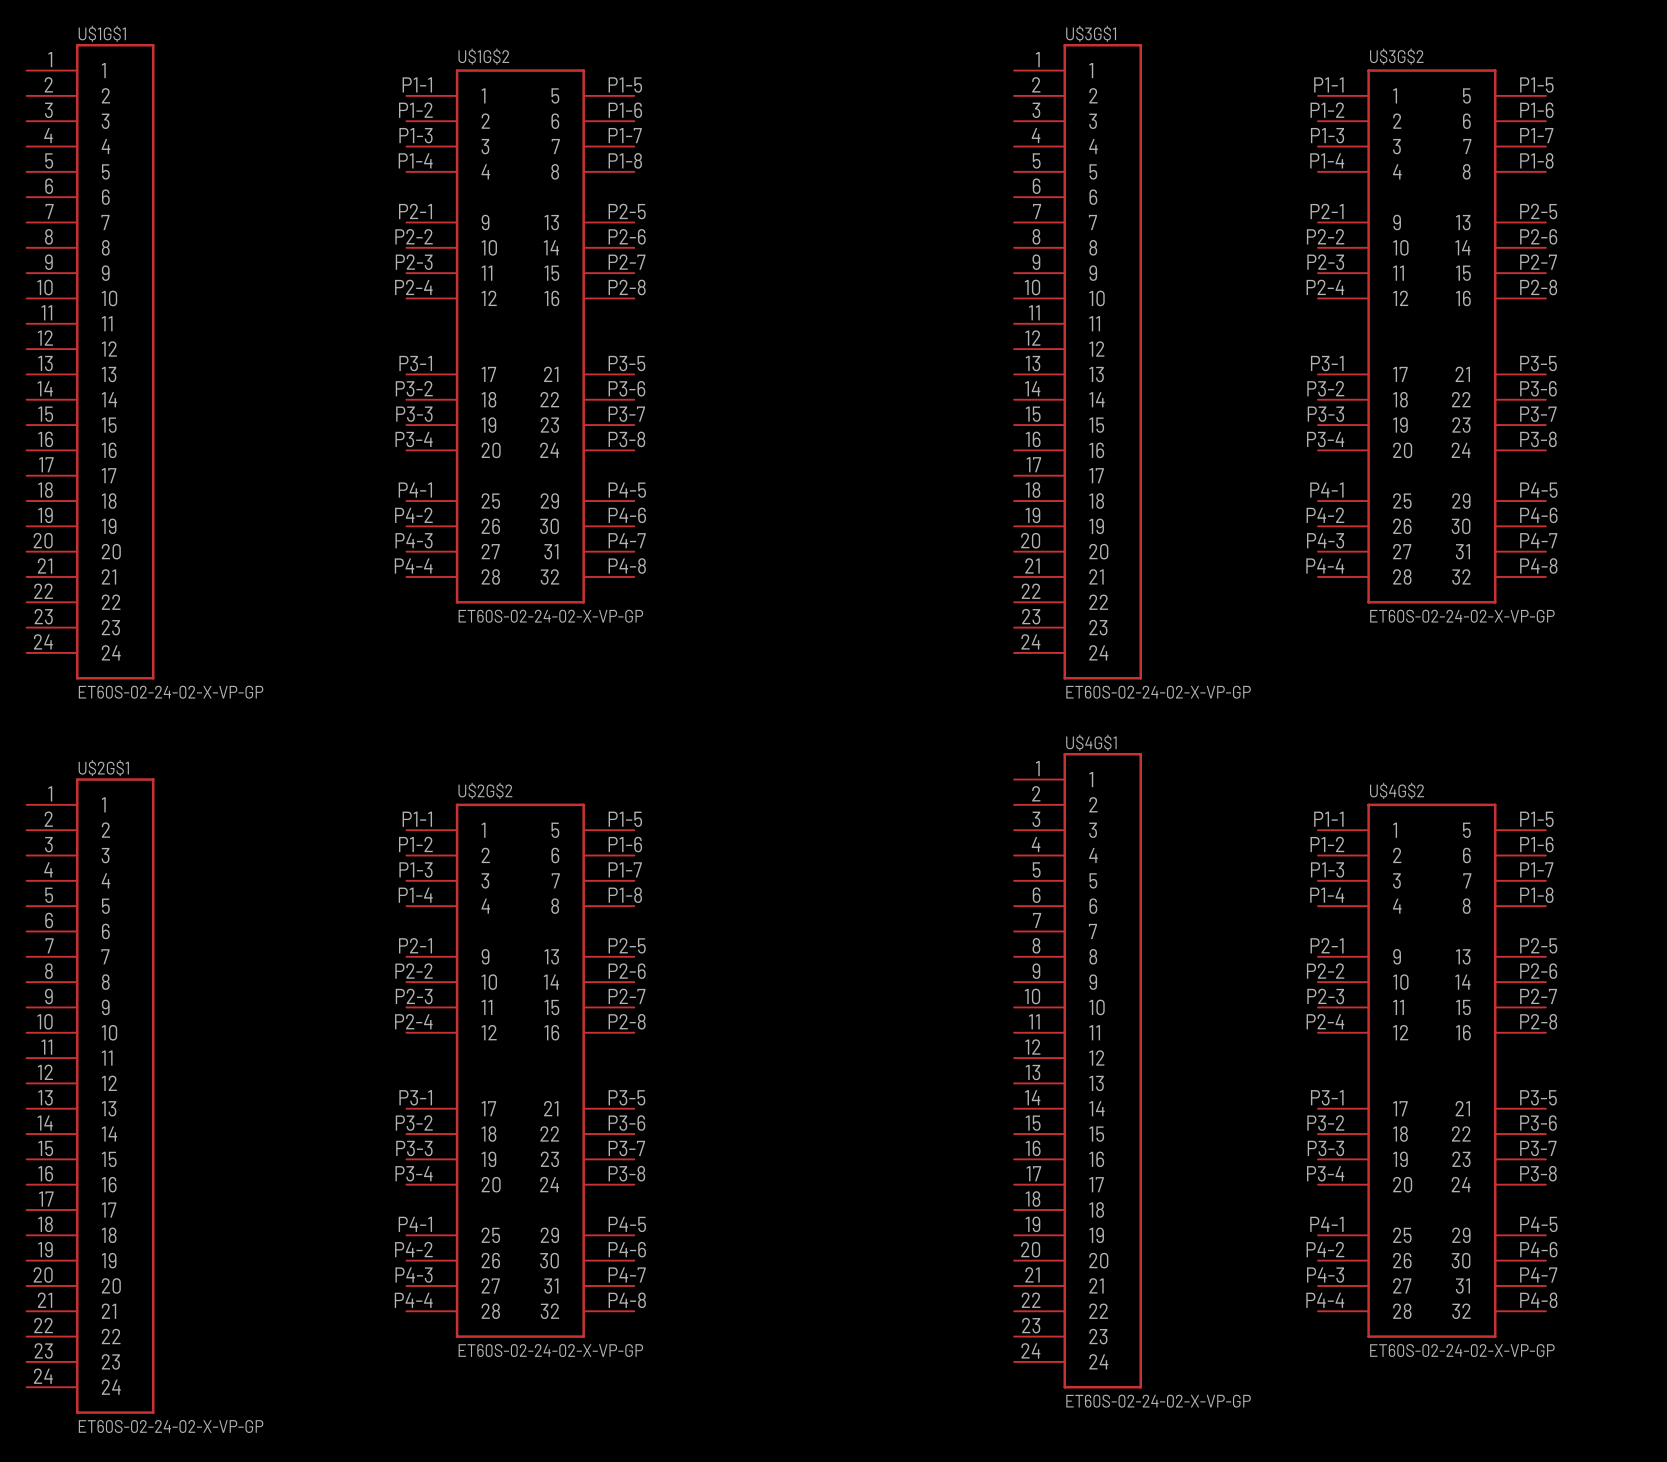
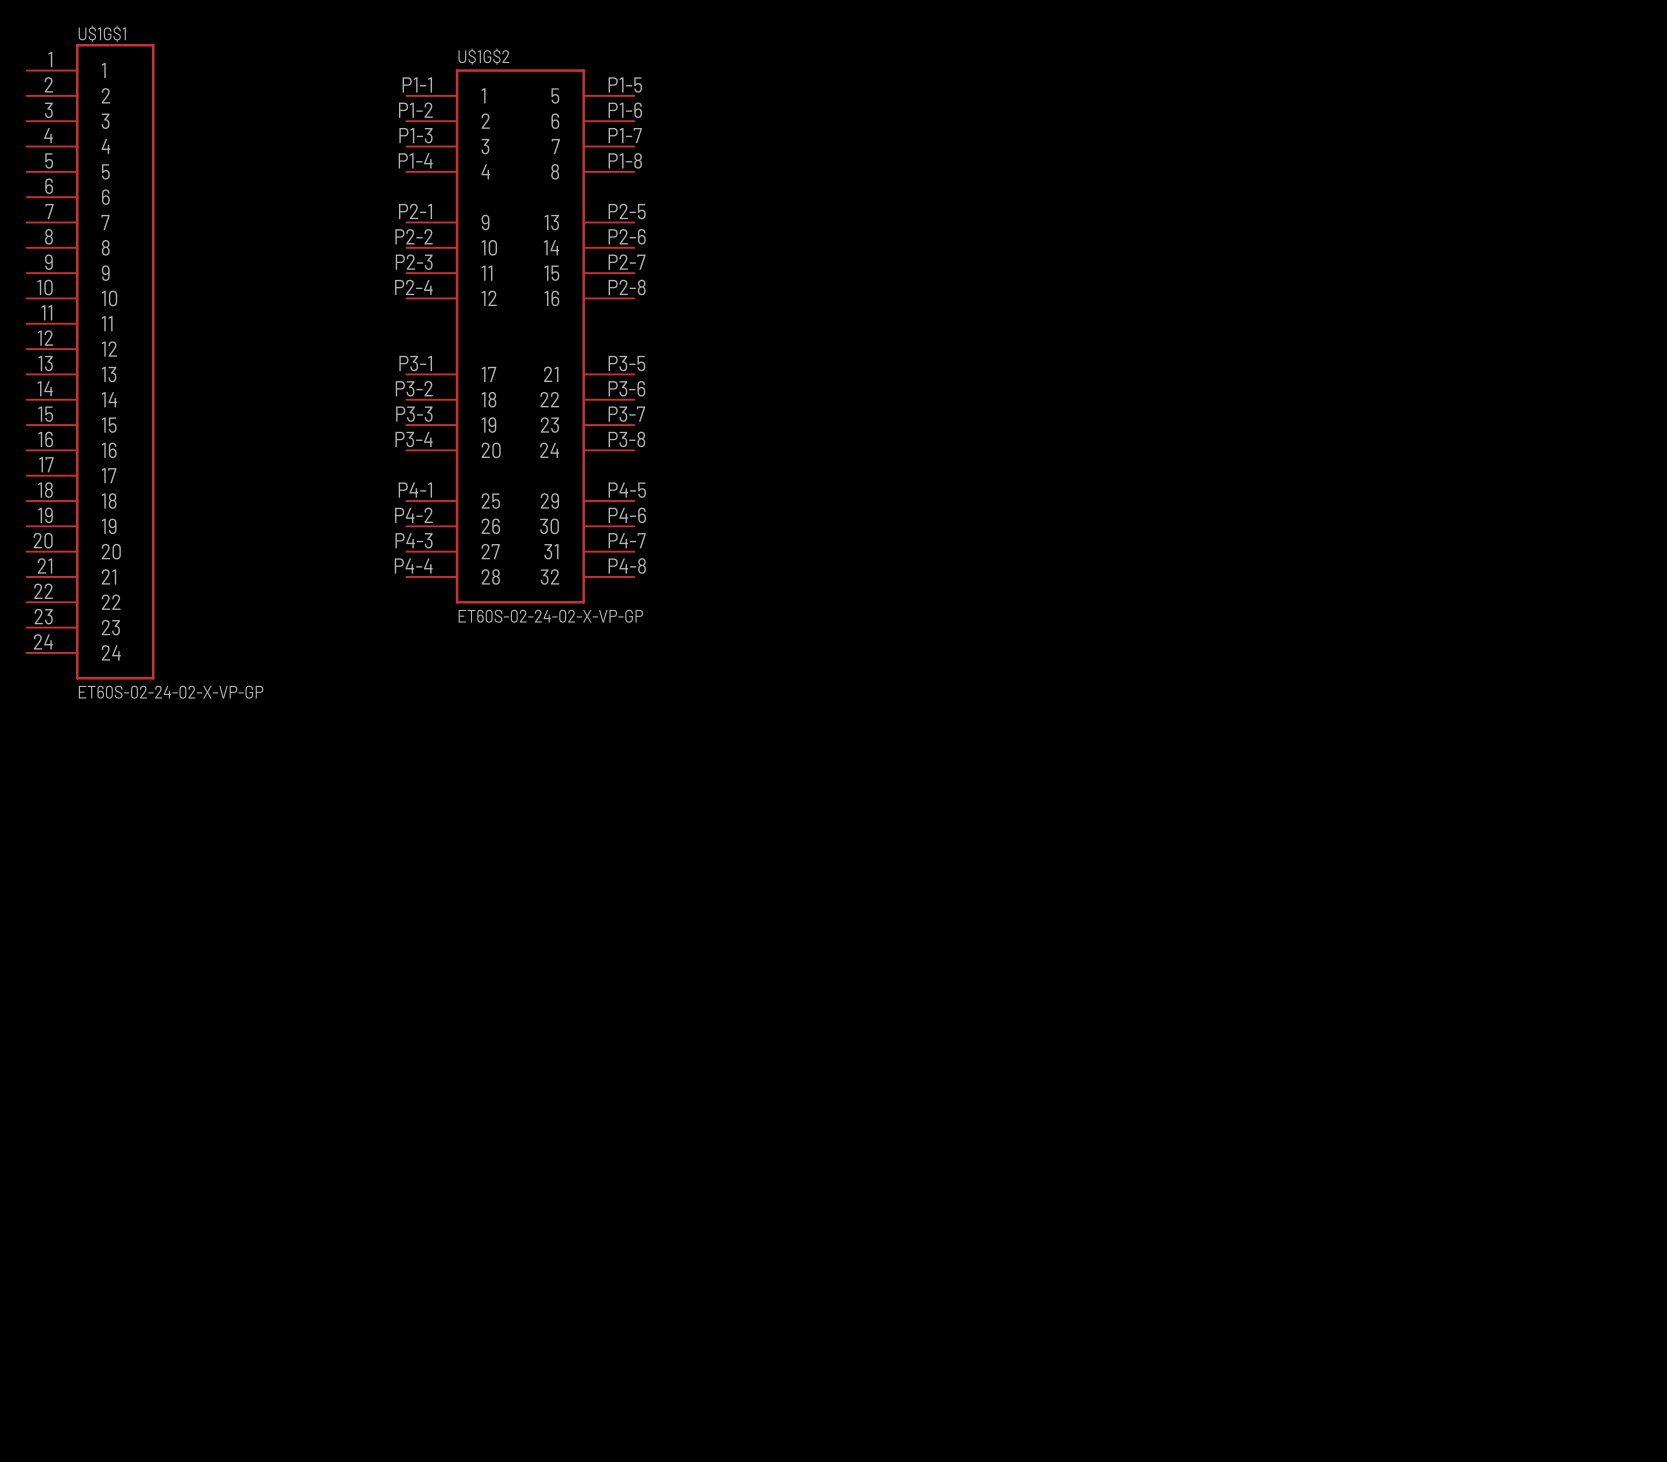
U$3G$2: ET60S-02-24-02-X-VP-GP (1431, 336) -> none
U$3G$1: ET60S-02-24-02-X-VP-GP (1078, 361) -> none
U$2G$2: ET60S-02-24-02-X-VP-GP (520, 1070) -> none
U$4G$1: ET60S-02-24-02-X-VP-GP (1078, 1070) -> none
U$4G$2: ET60S-02-24-02-X-VP-GP (1431, 1070) -> none
U$2G$1: ET60S-02-24-02-X-VP-GP (90, 1096) -> none

